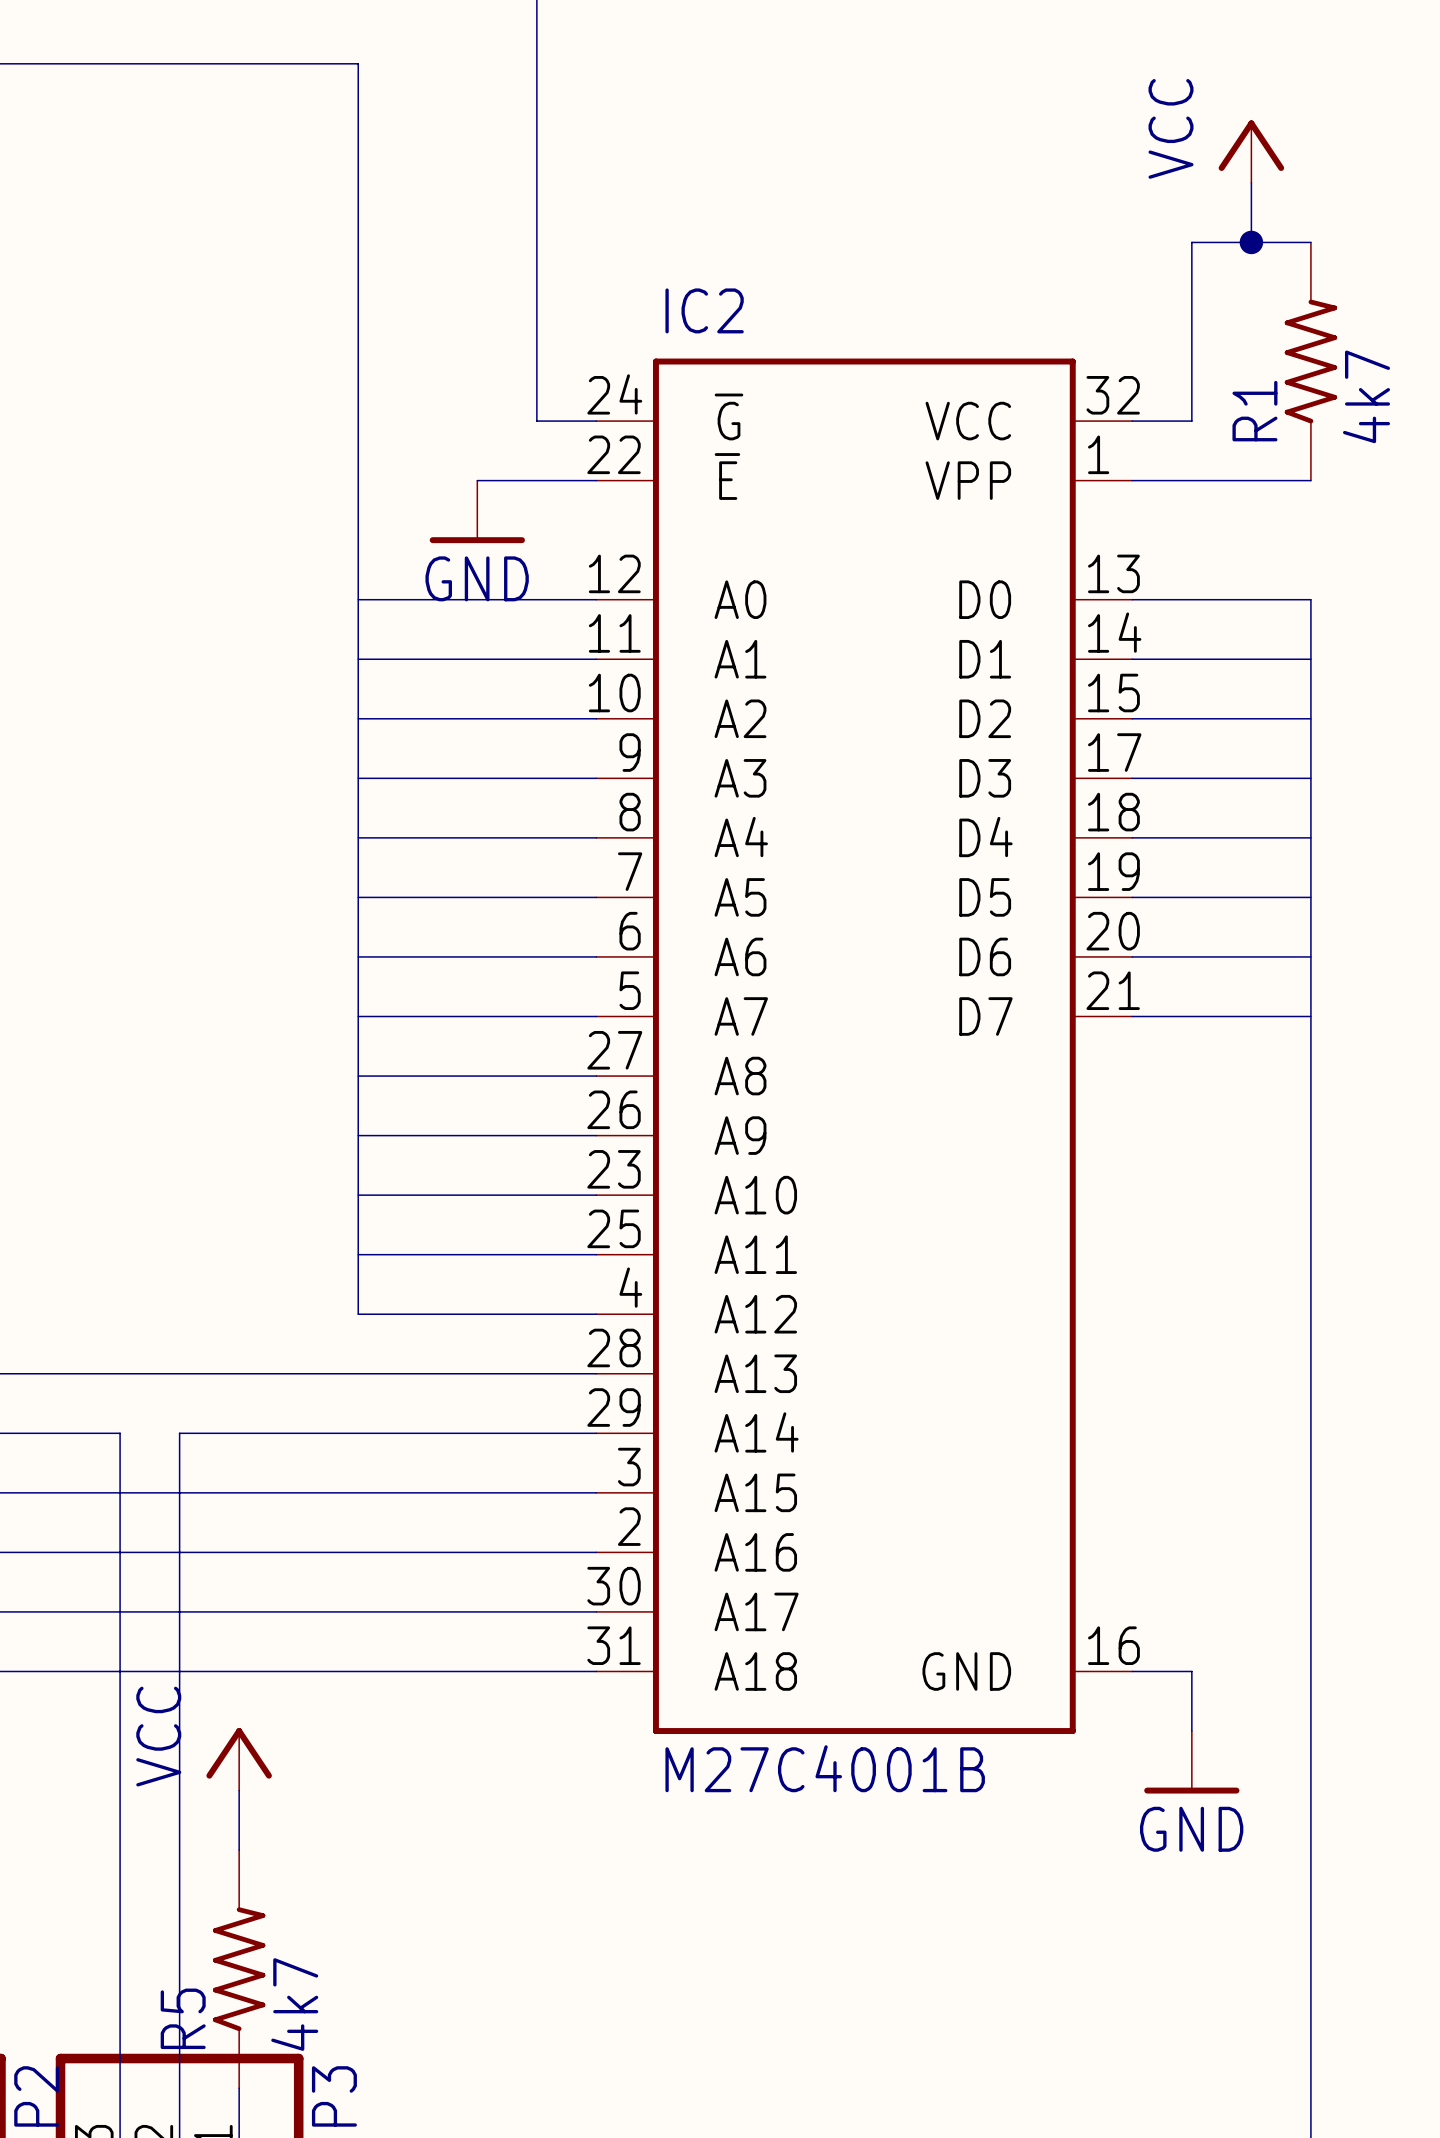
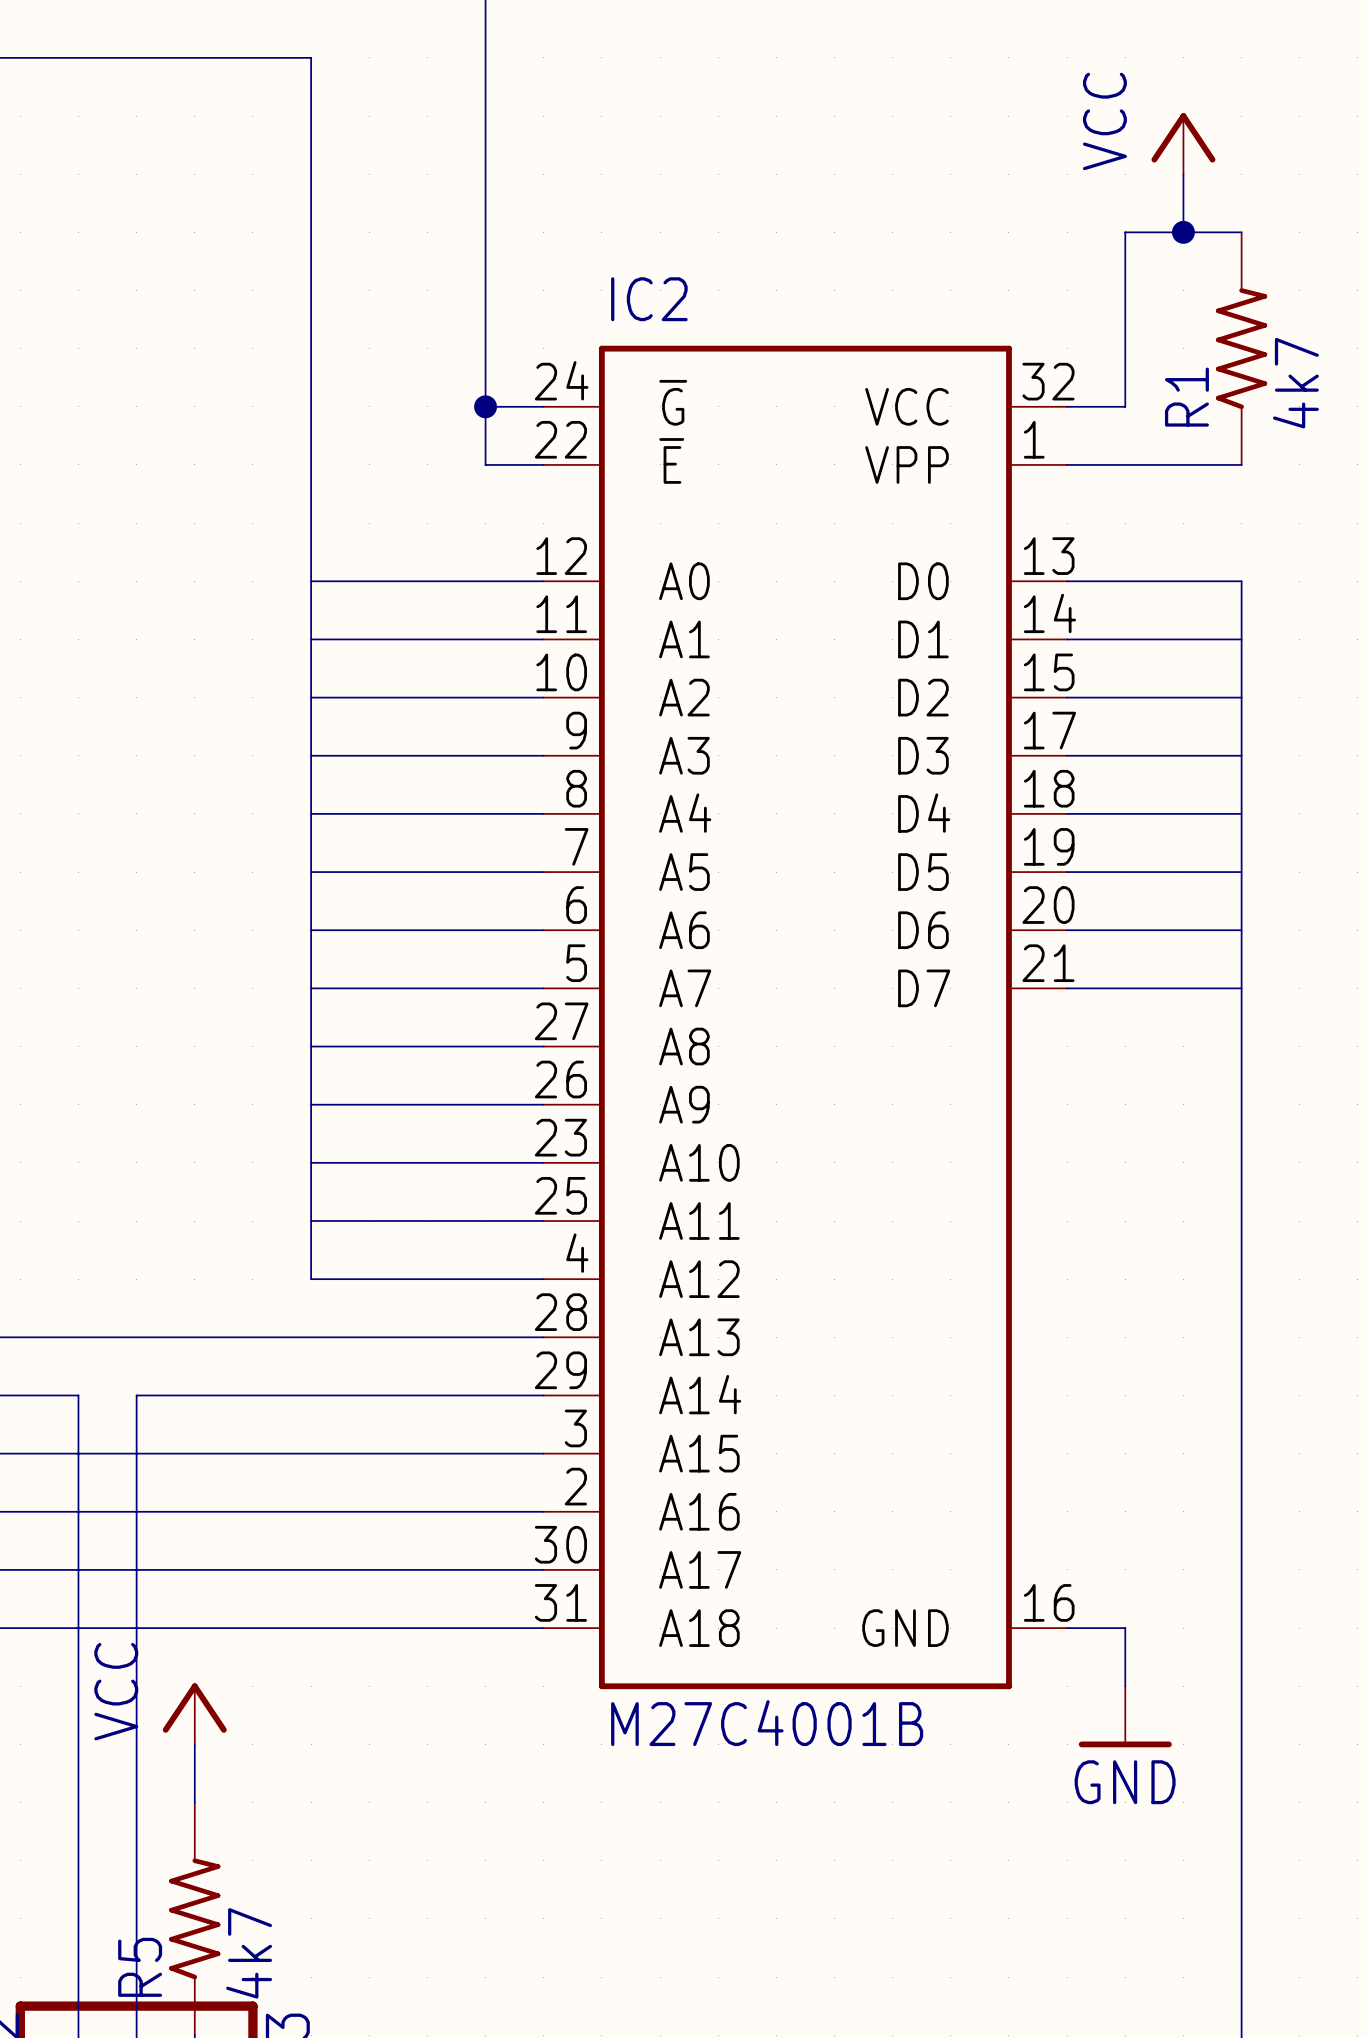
junction: none -> (485, 406)
wire: (477, 480) (536, 480) -> (485, 406) (485, 464)
power symbol: GND (477, 511) -> none

